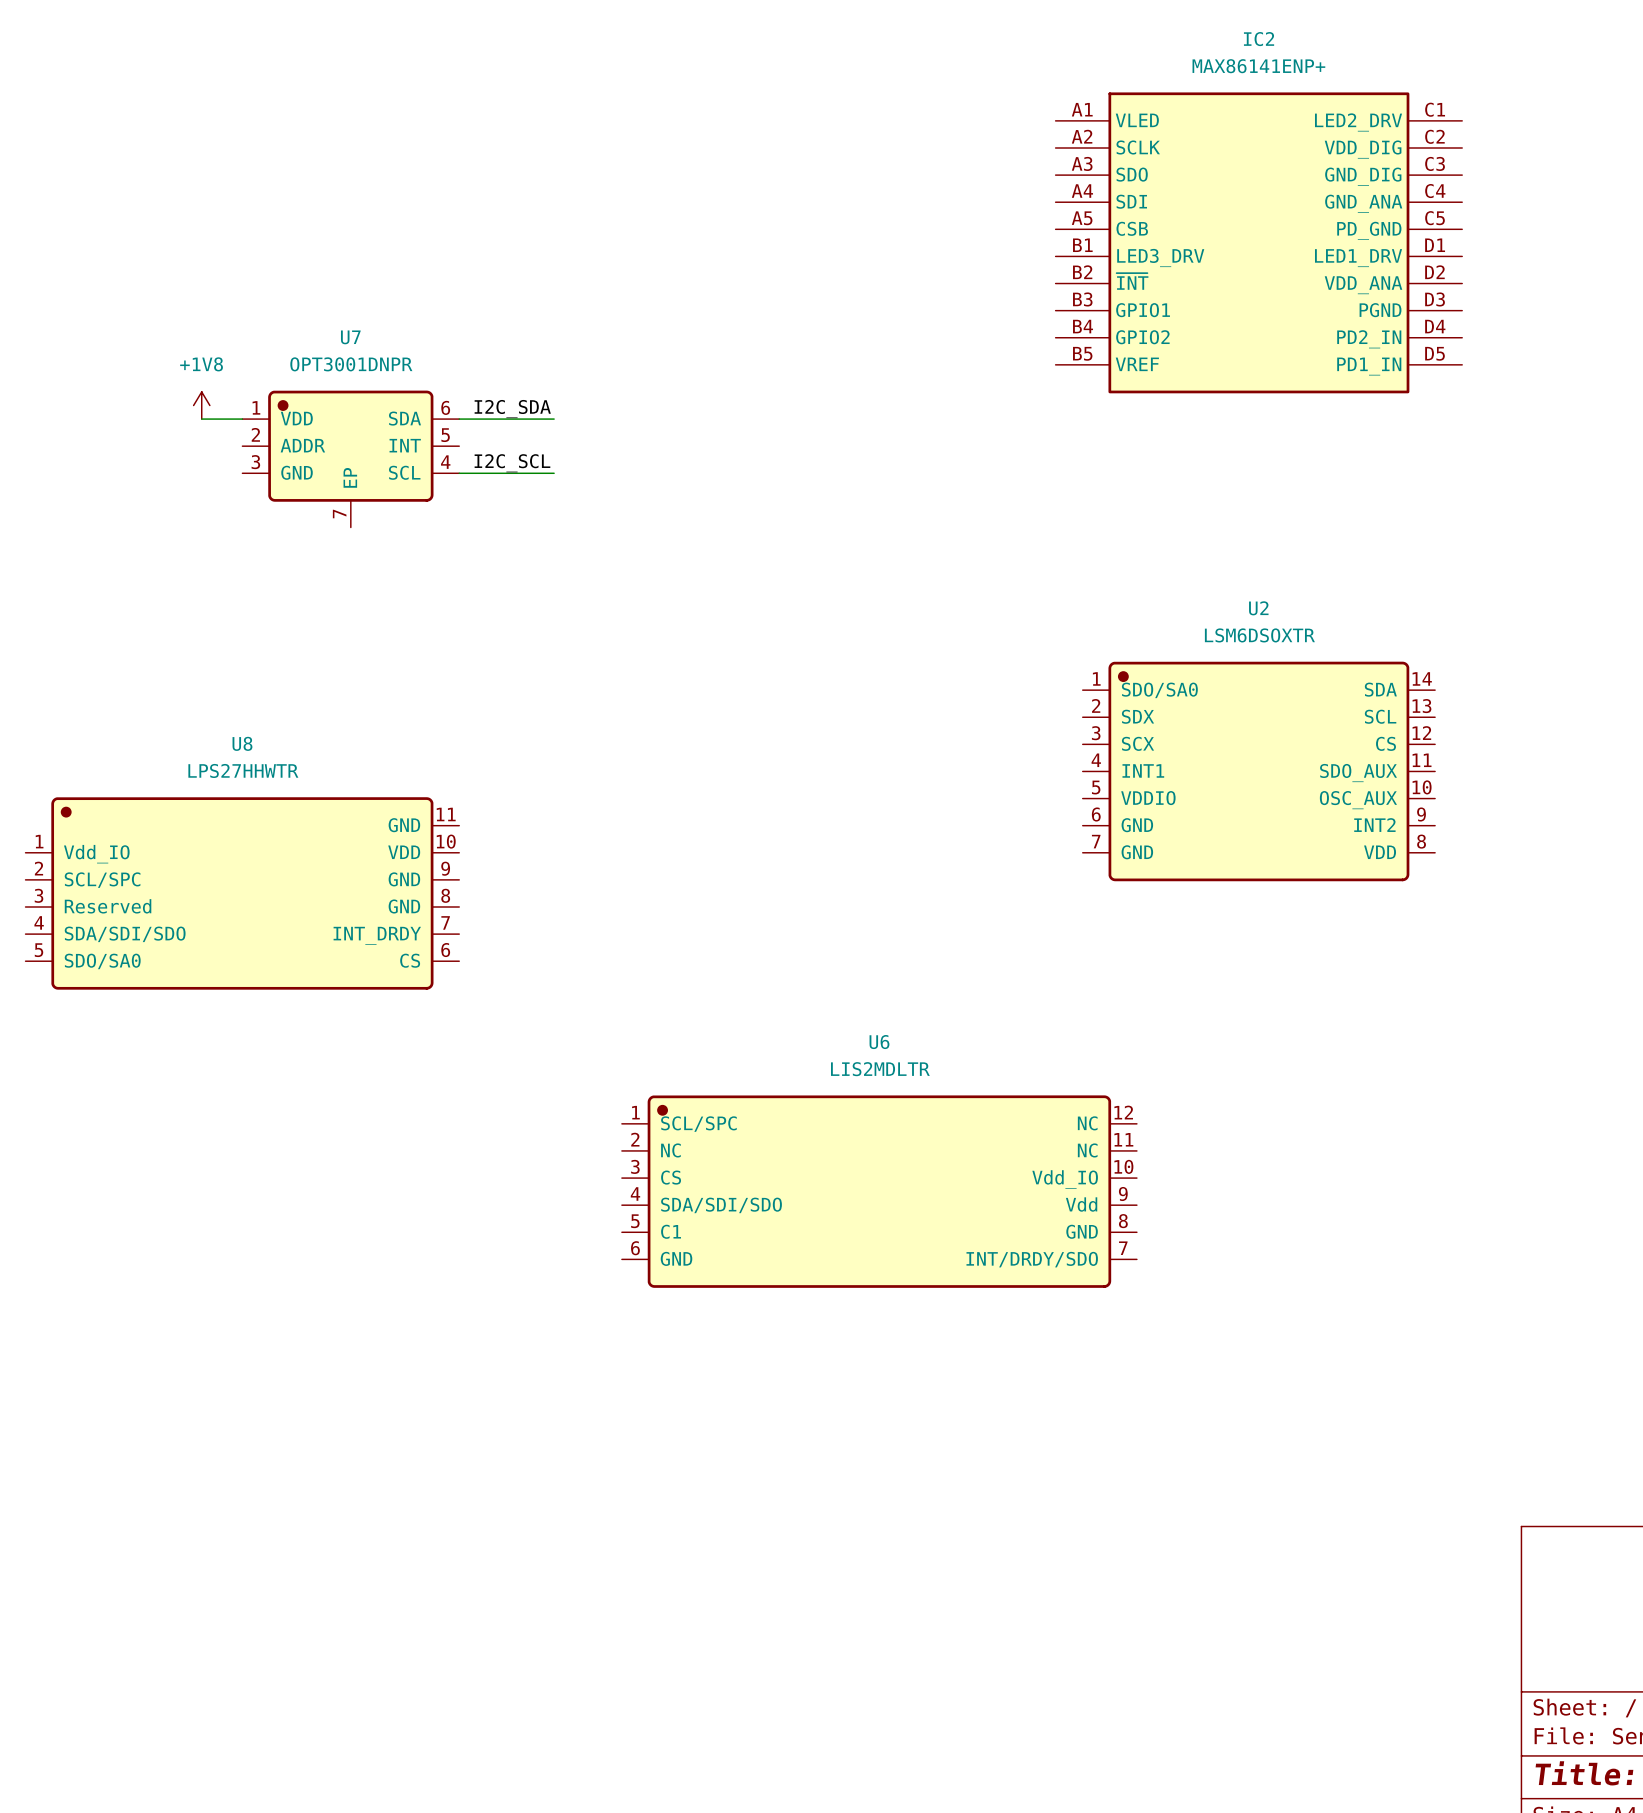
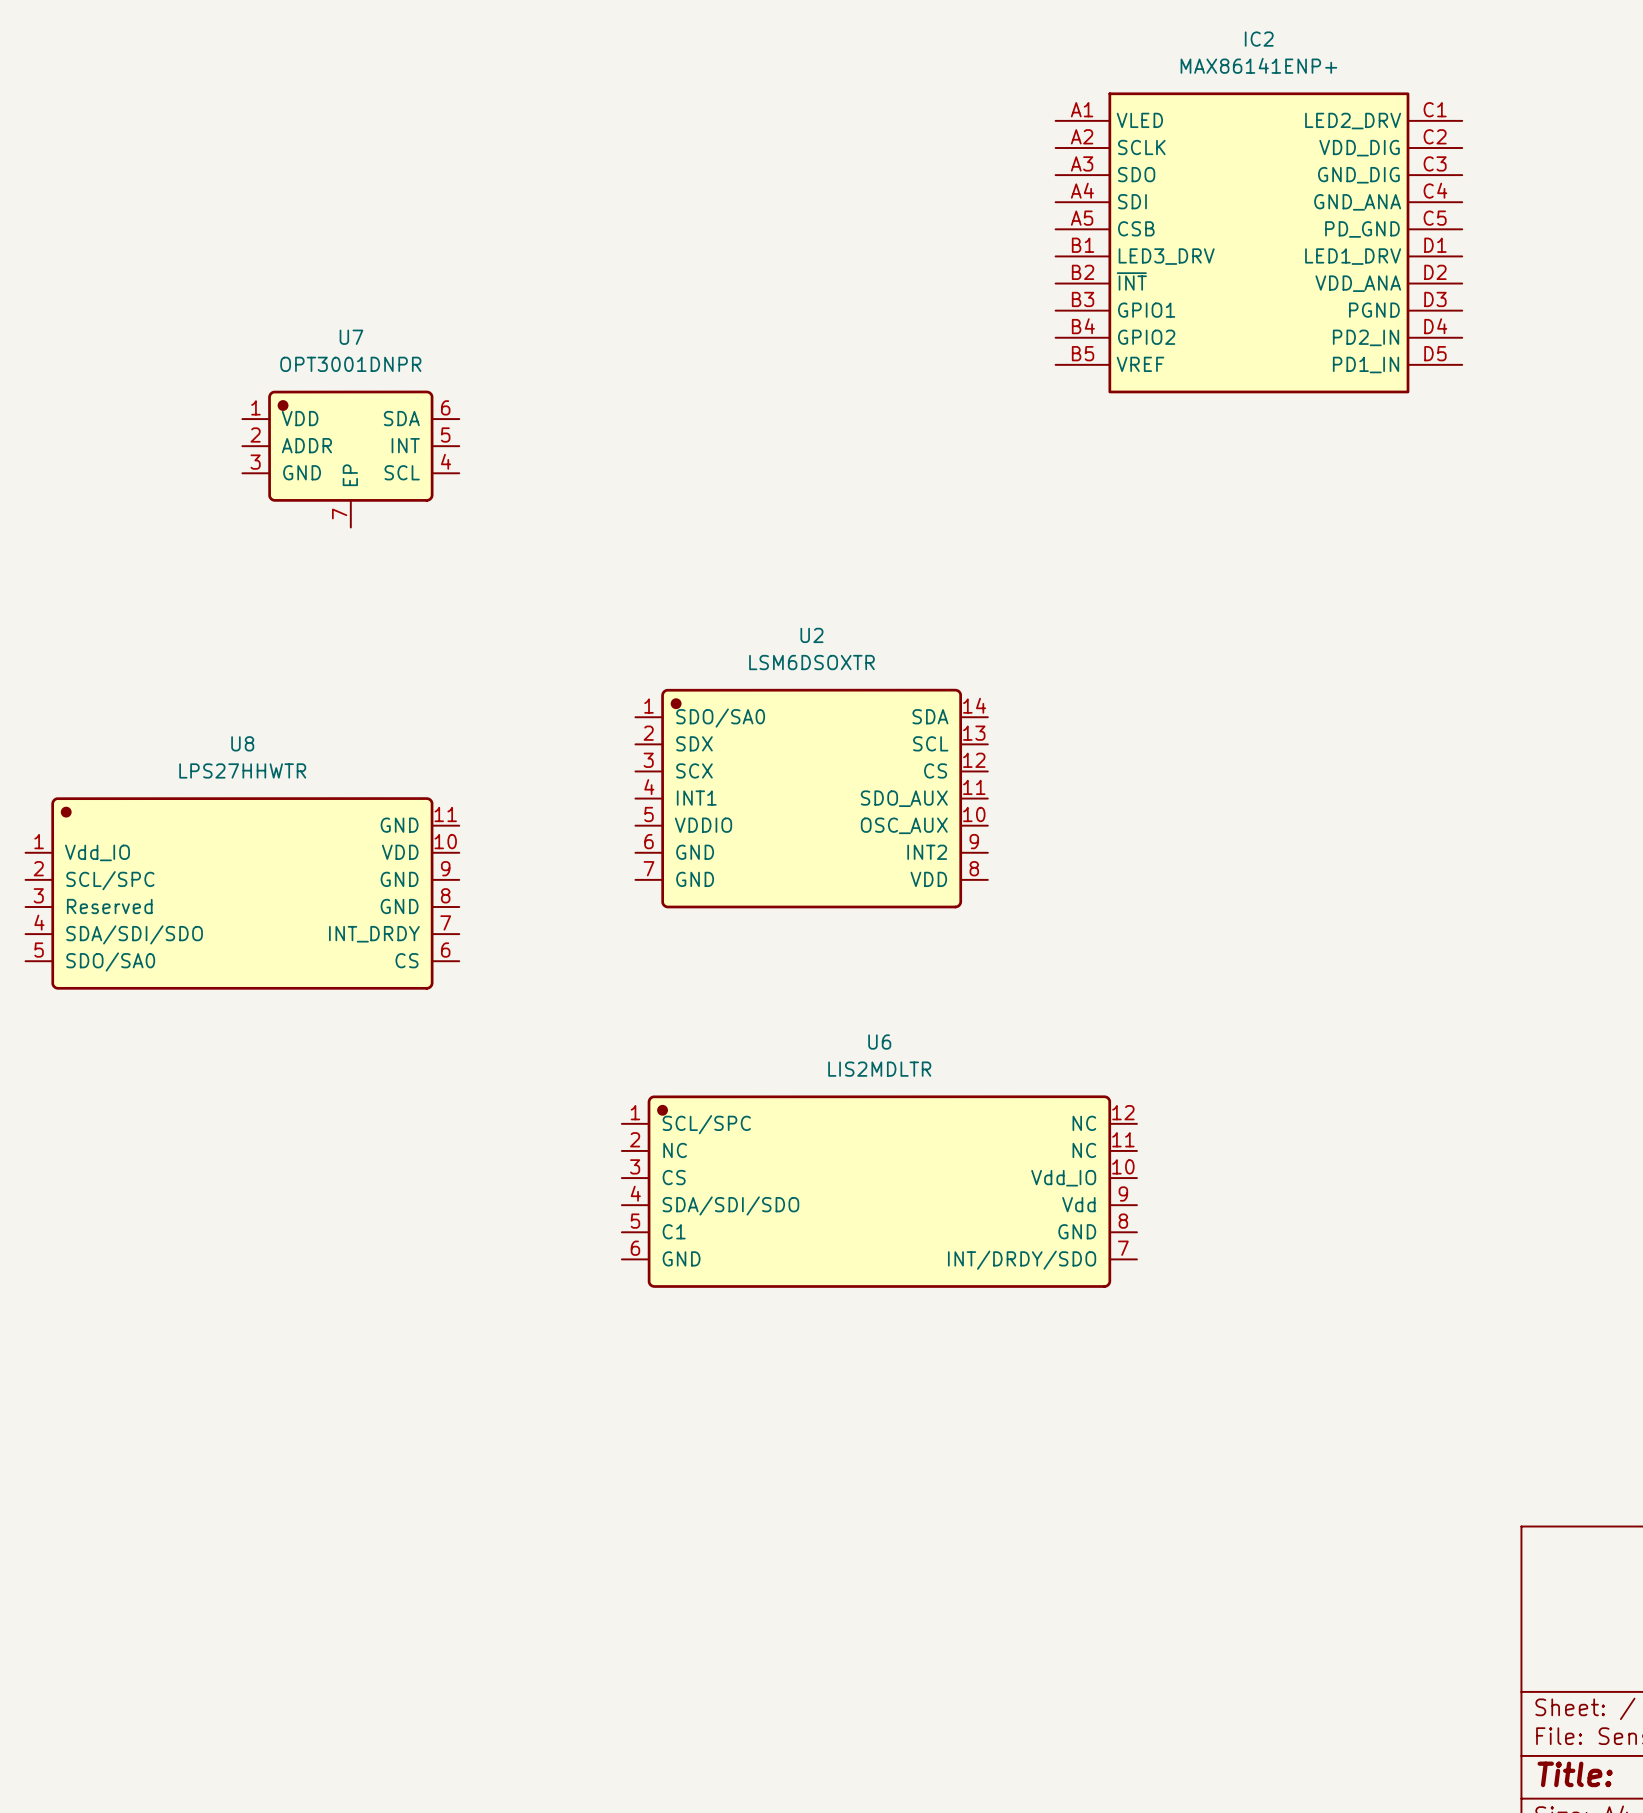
power symbol: +1V8 (201, 405) -> none
label: I2C_SDA (512, 409) -> none
wire: (201, 419) (242, 419) -> none
wire: (459, 419) (554, 419) -> none
label: I2C_SCL (512, 463) -> none
wire: (459, 473) (554, 473) -> none
U2 position: (1258, 771) -> (811, 798)

